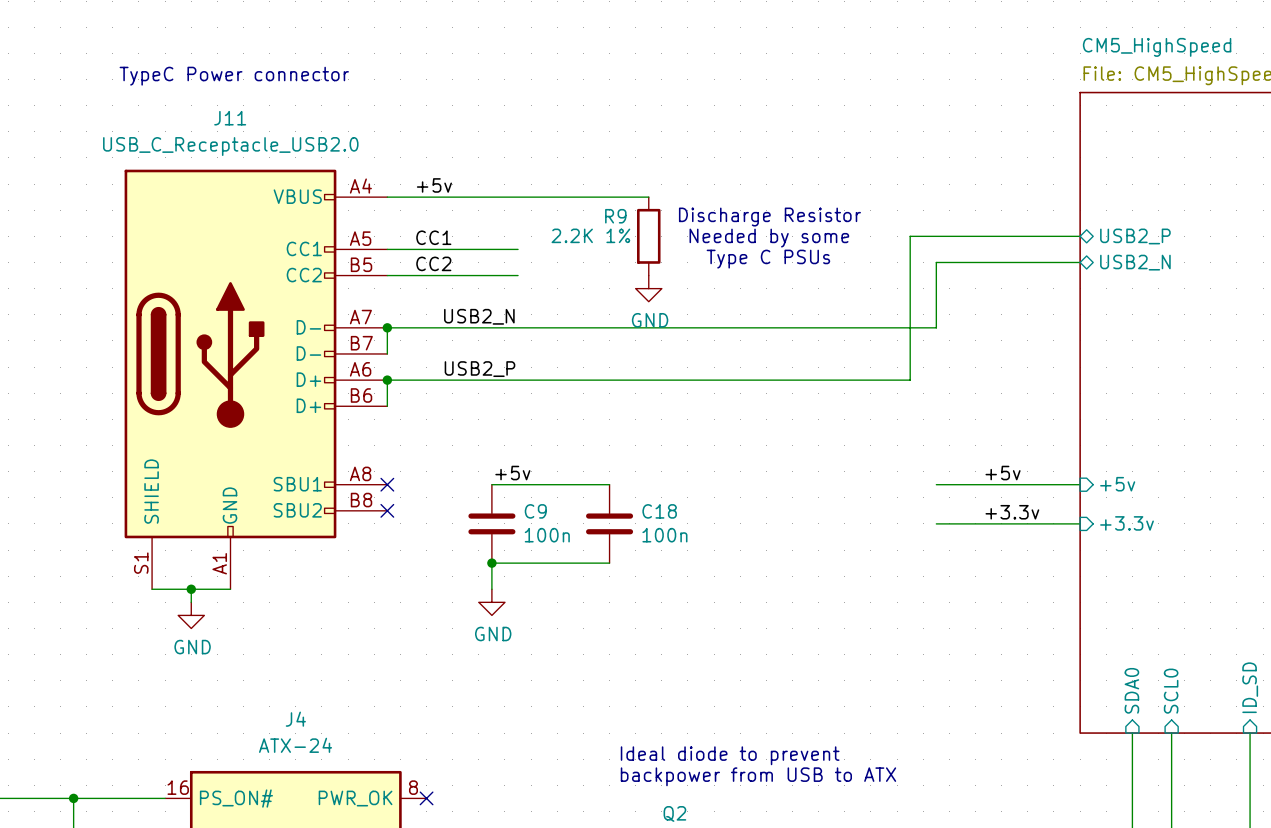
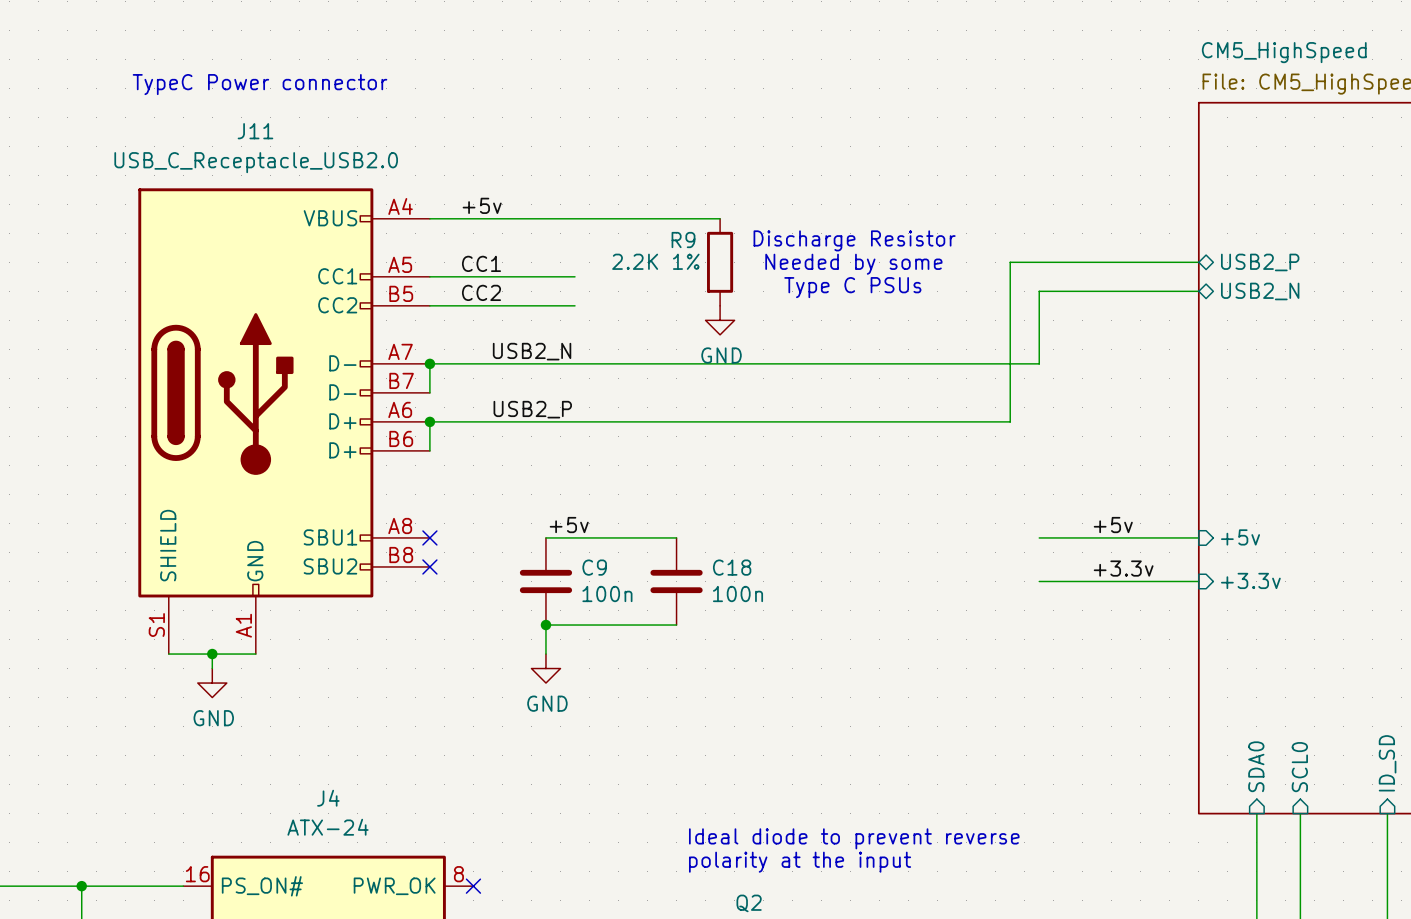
text: Ideal diode to prevent (730, 755) -> Ideal diode to prevent reverse (854, 838)
text: backpower from USB to ATX (758, 776) -> polarity at the input (800, 862)

